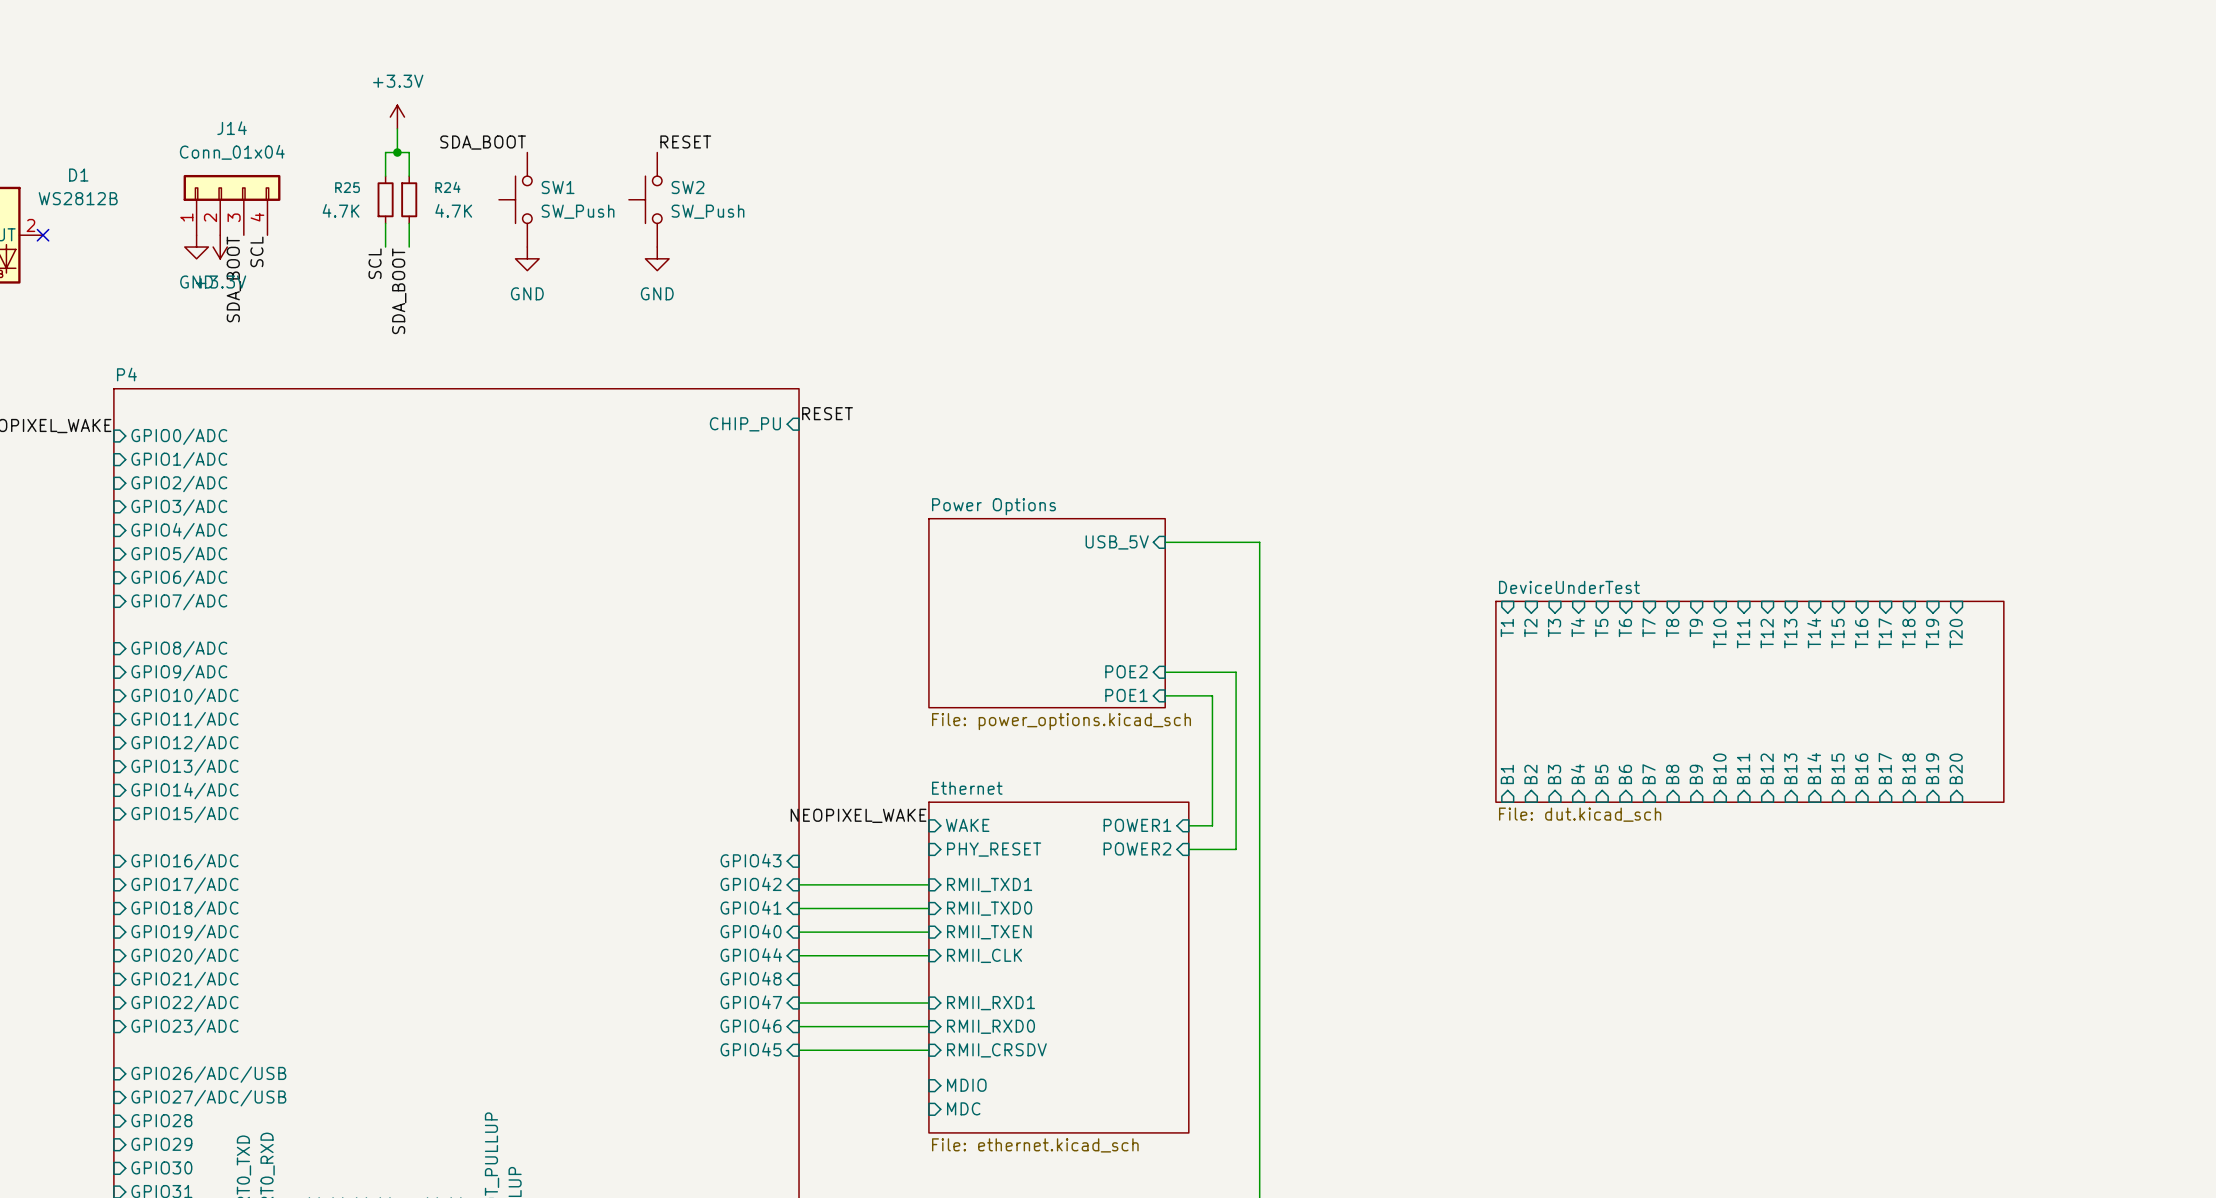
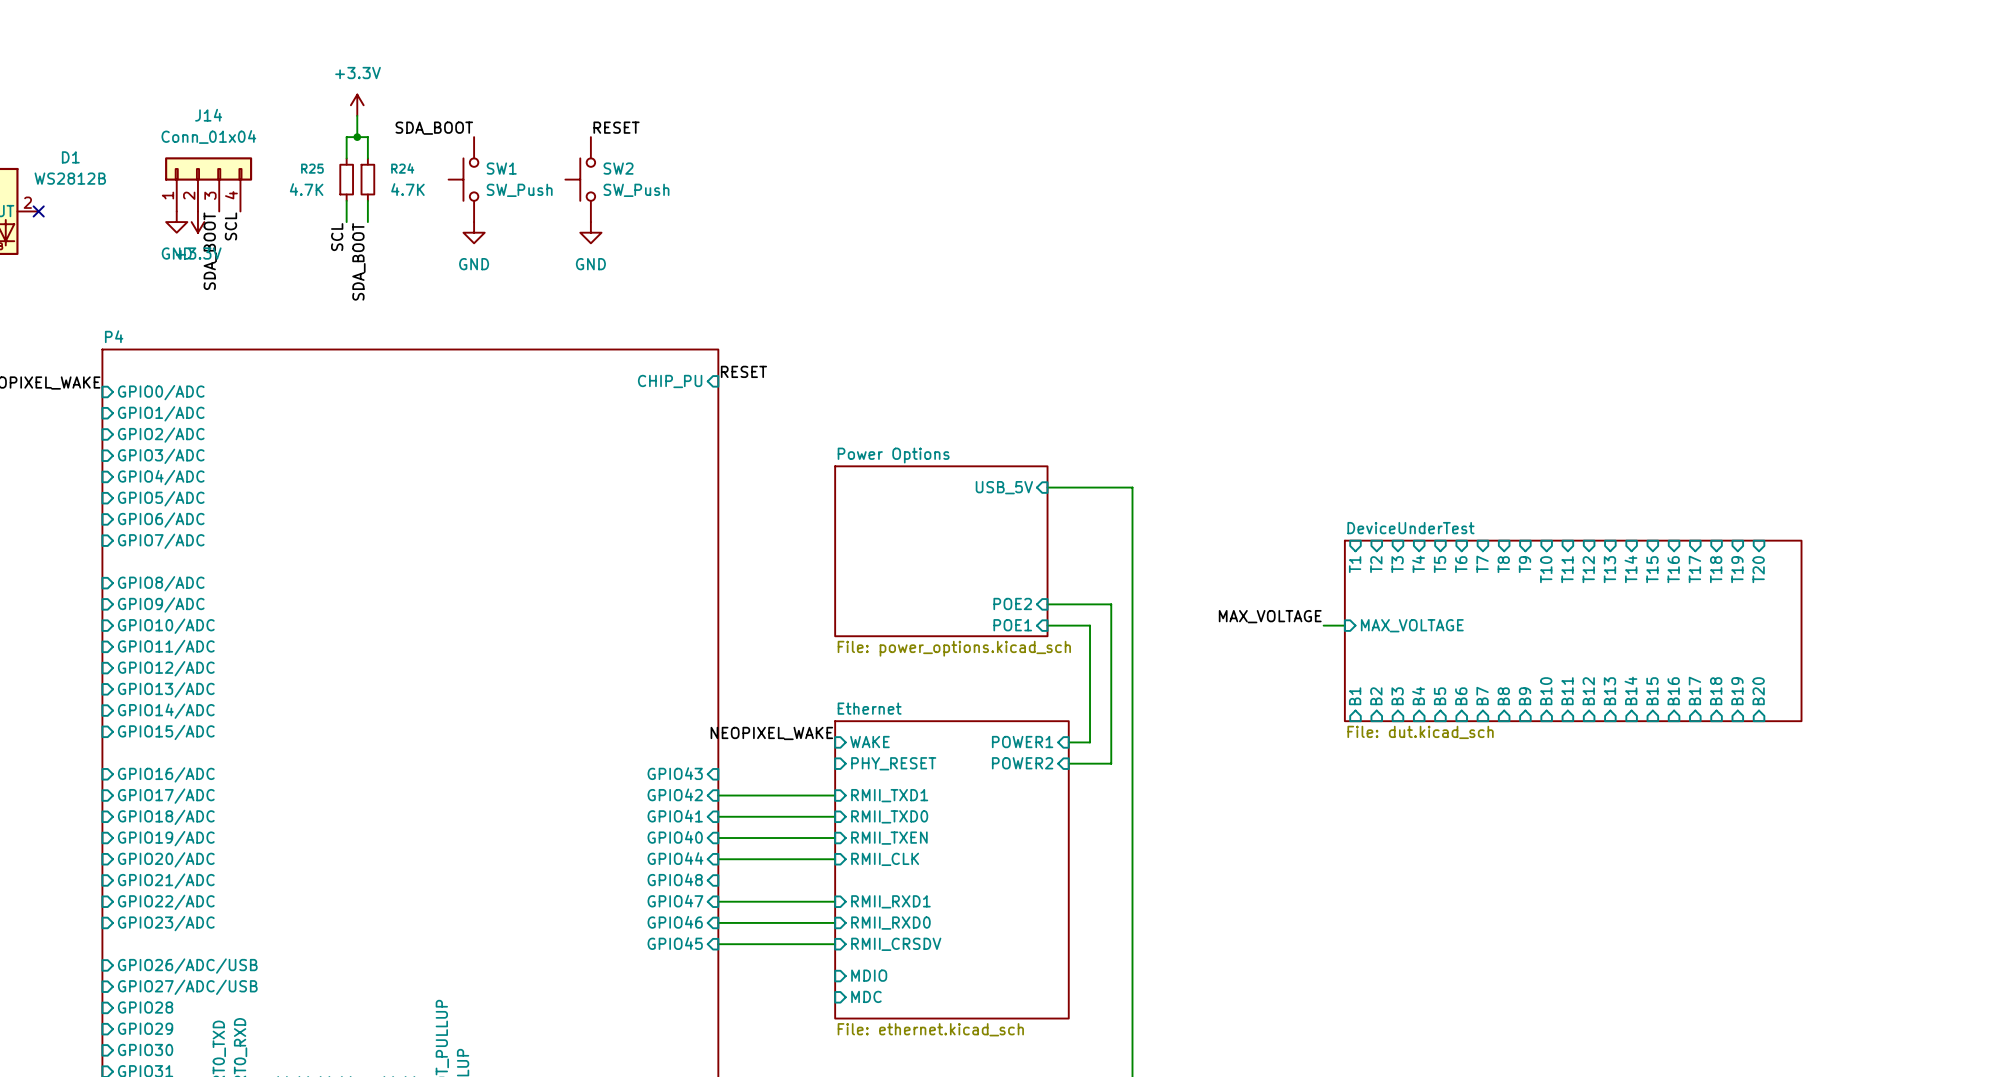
label: none -> MAX_VOLTAGE (1270, 616)
wire: none -> (1323, 625) (1344, 625)
sheet pin: none -> MAX_VOLTAGE (1412, 625)

